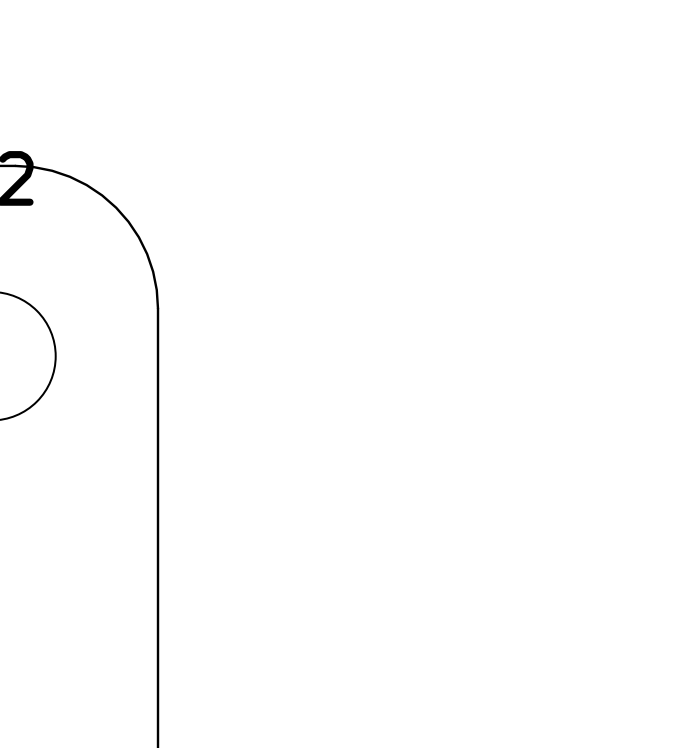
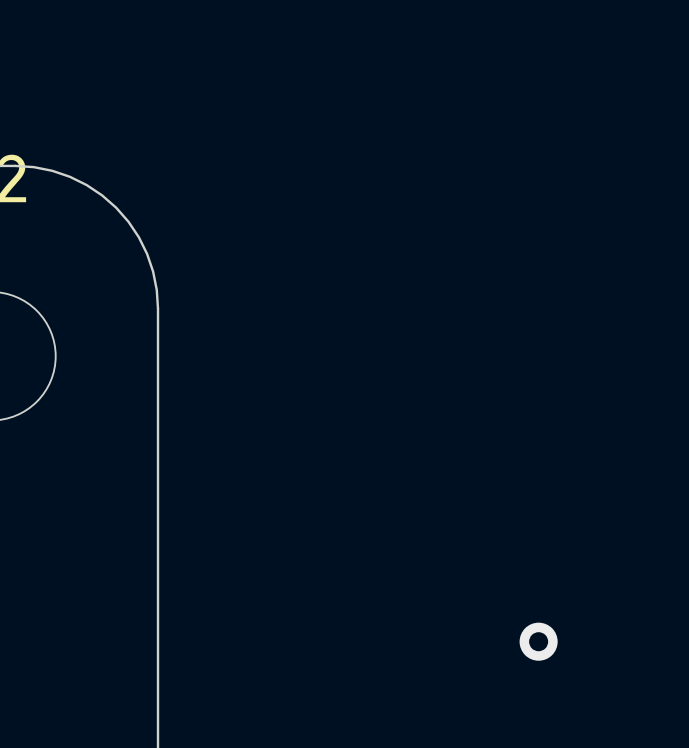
via: none -> (538, 641)

